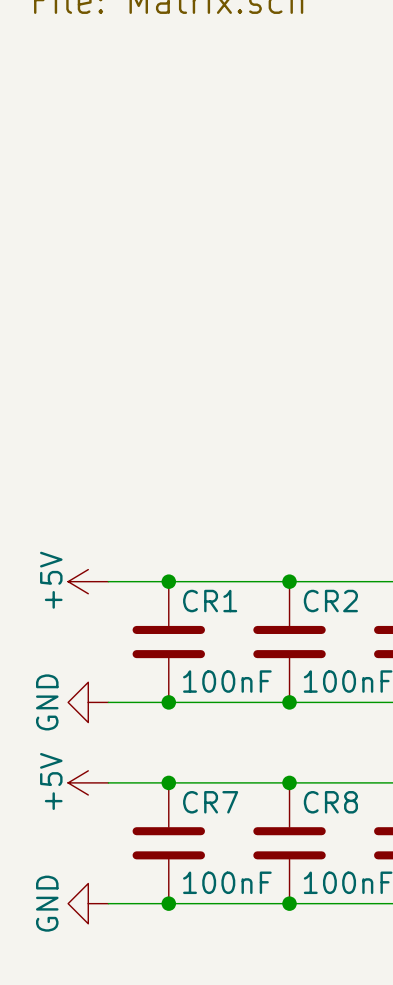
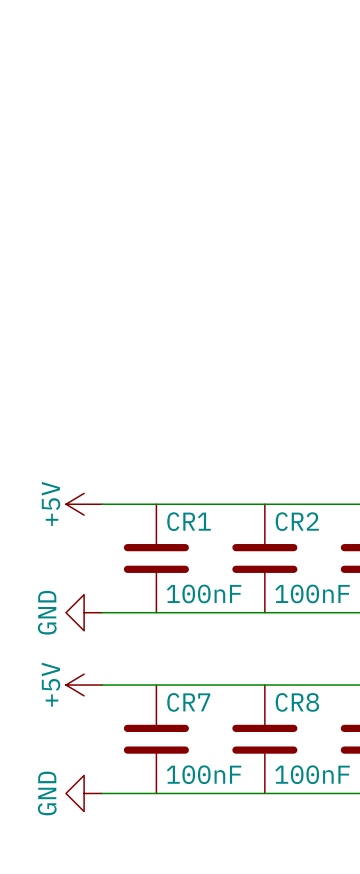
junction: (168, 581) -> none
junction: (289, 581) -> none
junction: (168, 702) -> none
junction: (289, 702) -> none
junction: (168, 782) -> none
junction: (289, 782) -> none
junction: (168, 903) -> none
junction: (289, 903) -> none

